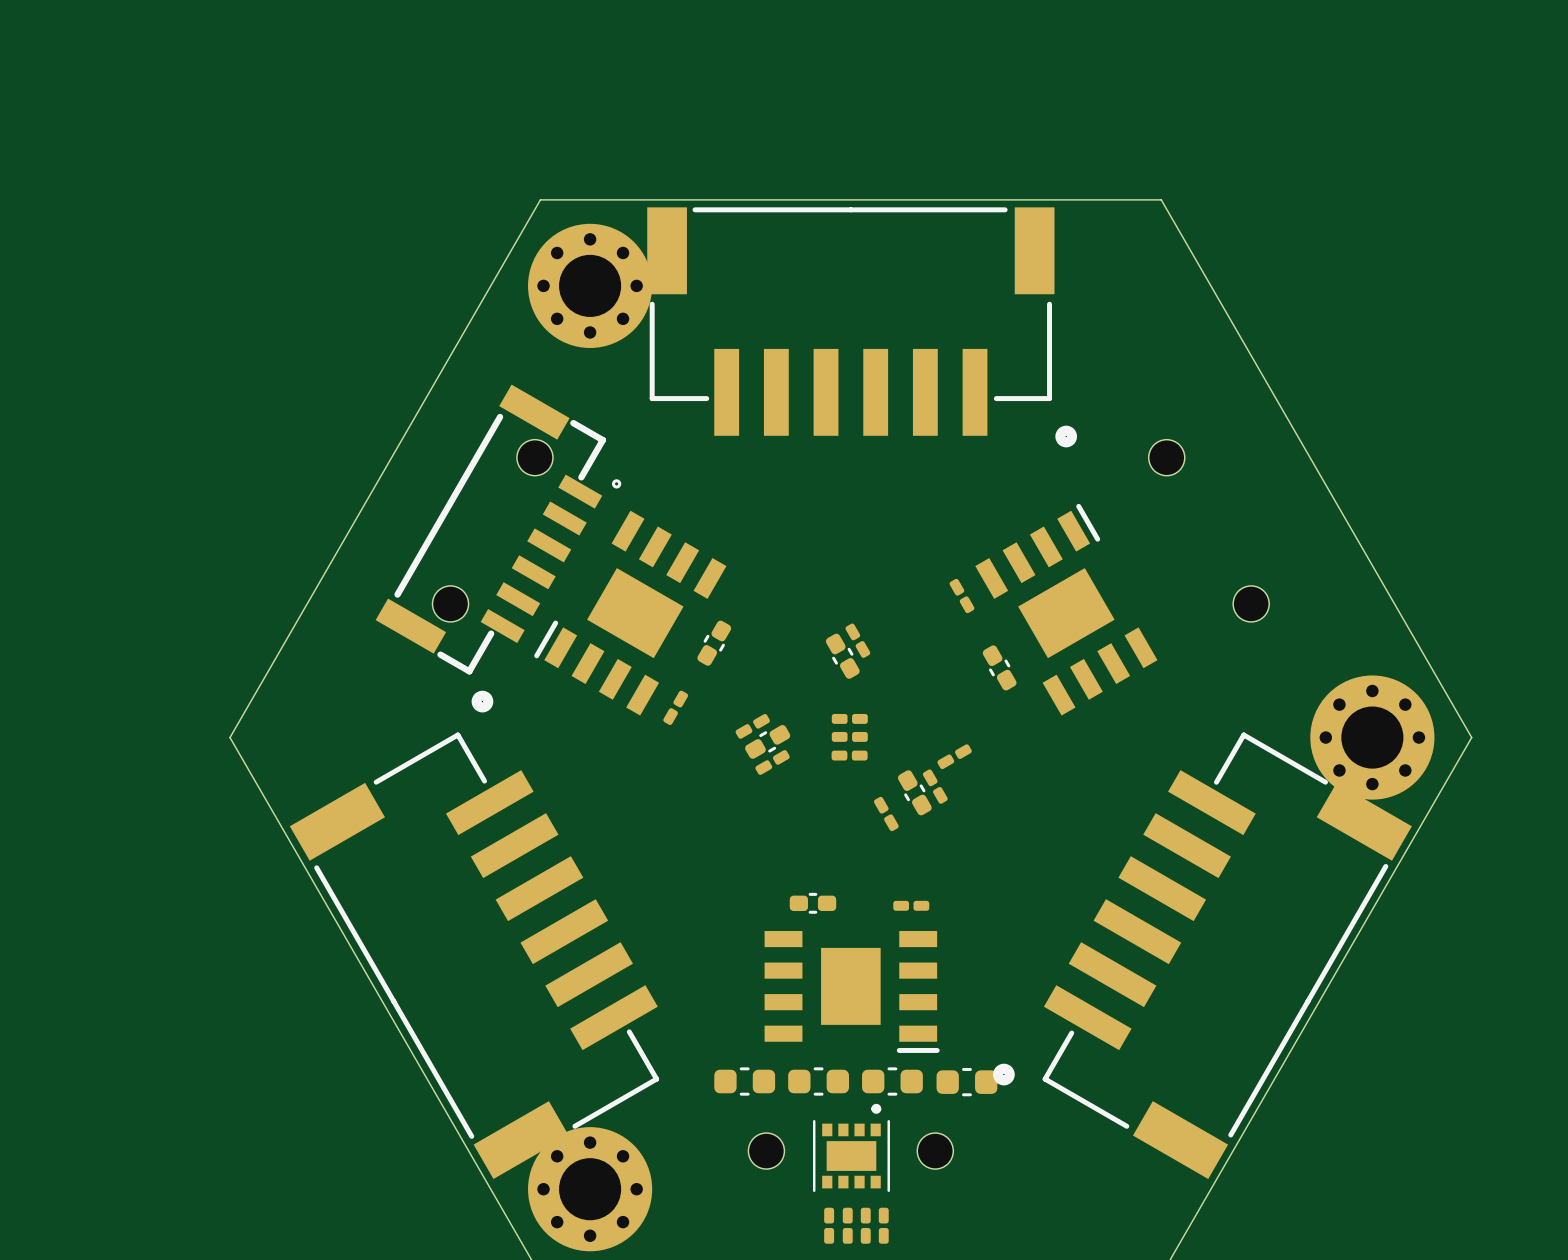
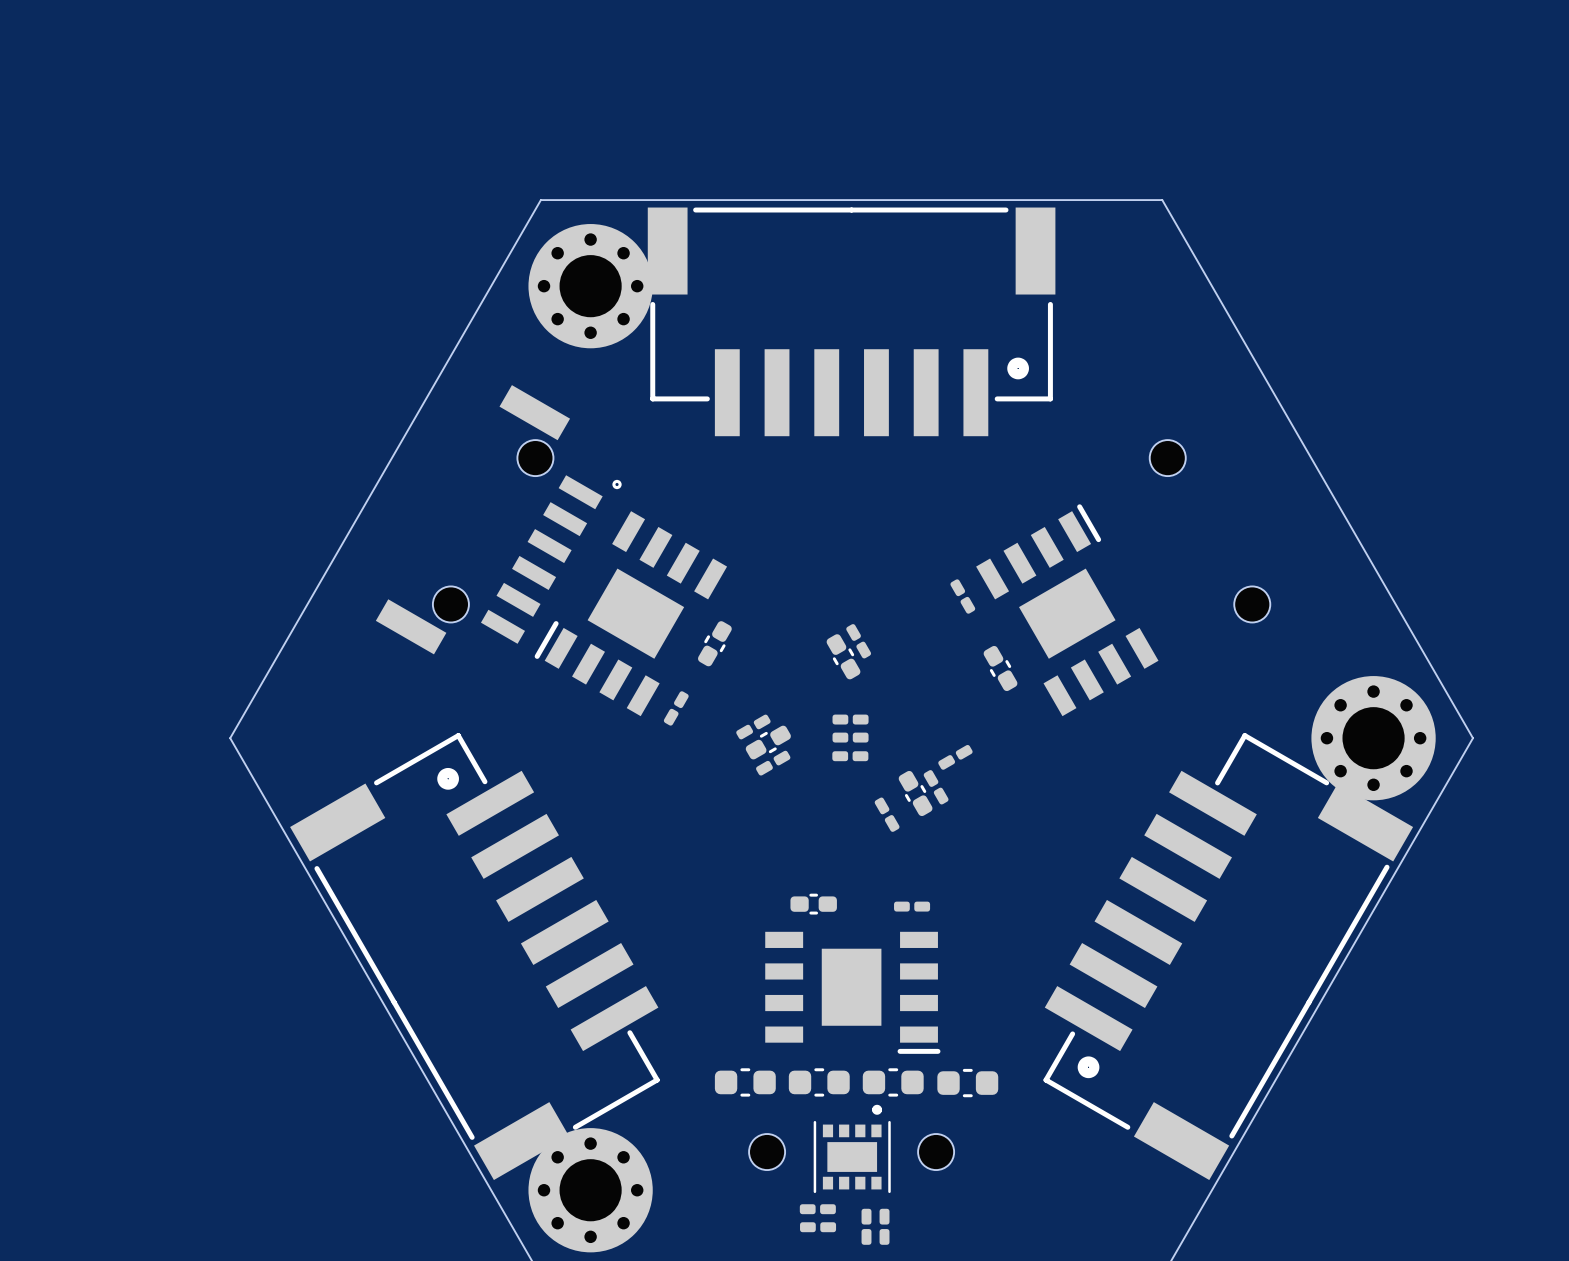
part footprint: [647, 207, 1078, 448] -> [647, 207, 1056, 437]
part footprint: [375, 384, 622, 675] -> [375, 385, 622, 655]
part footprint: [289, 690, 660, 1180] -> [290, 733, 660, 1181]
part footprint: [993, 732, 1412, 1180] -> [1043, 733, 1414, 1181]
part: none -> (817, 1209)
part: (829, 1225) -> none
part: (847, 1225) -> none
part: none -> (818, 1227)

